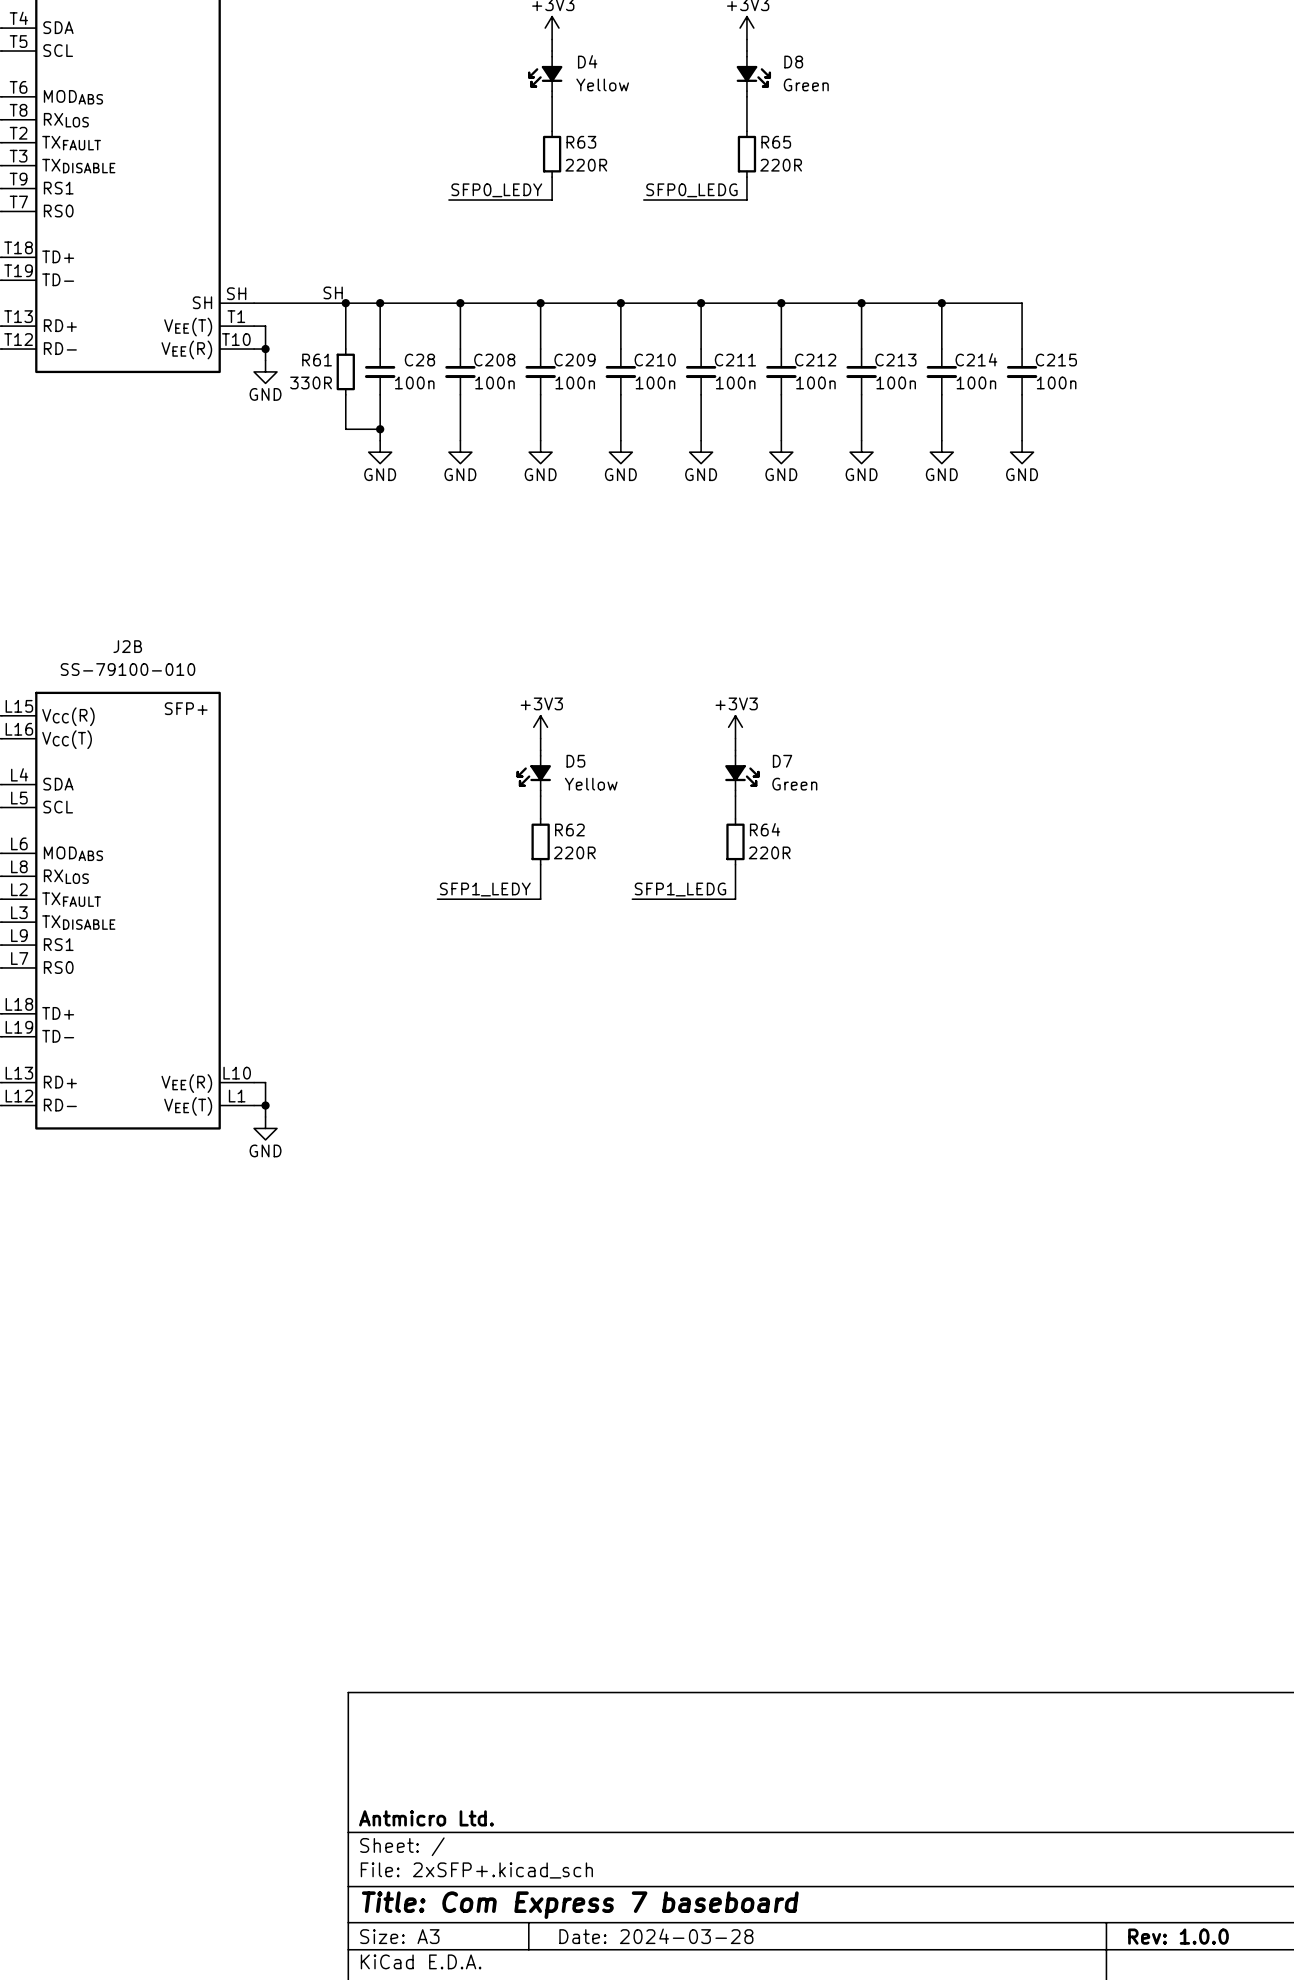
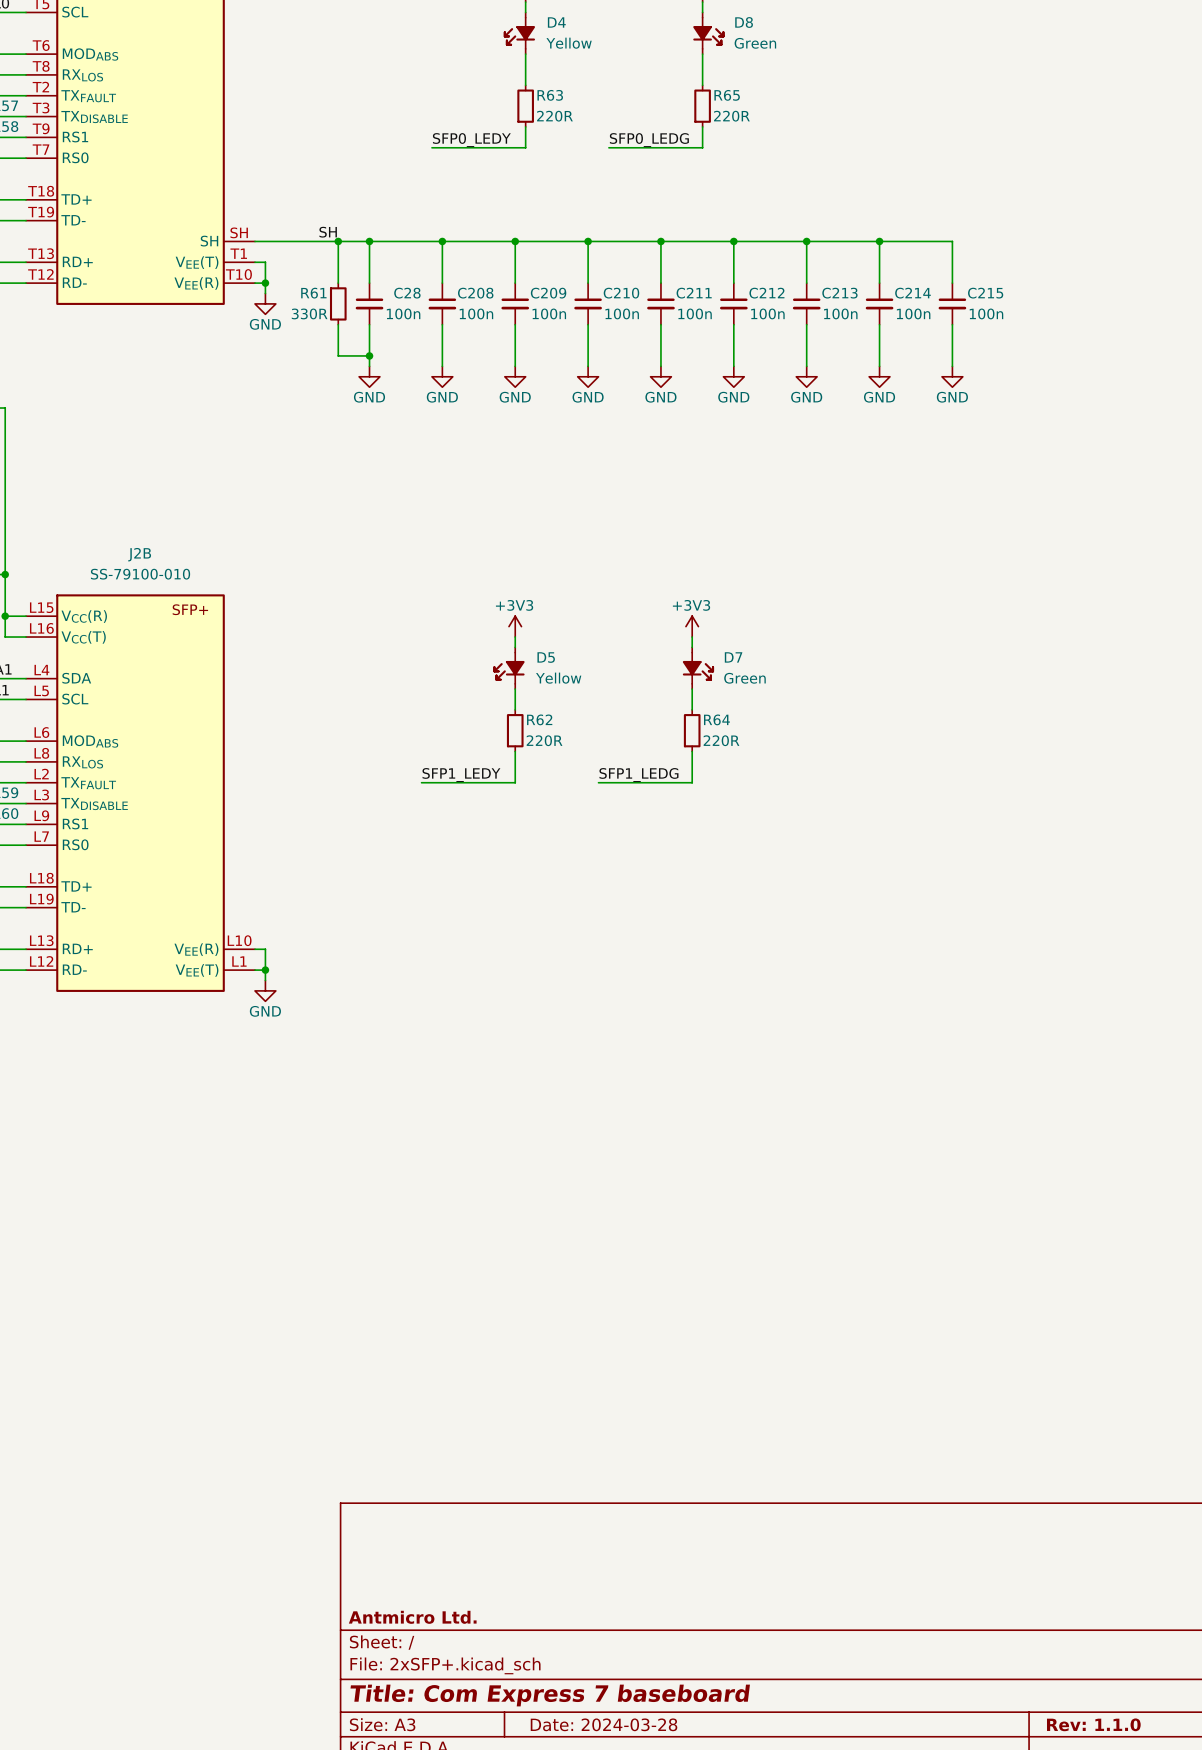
title block: Rev: 1.0.0 (1178, 1936) -> Rev: 1.1.0 (1093, 1724)

